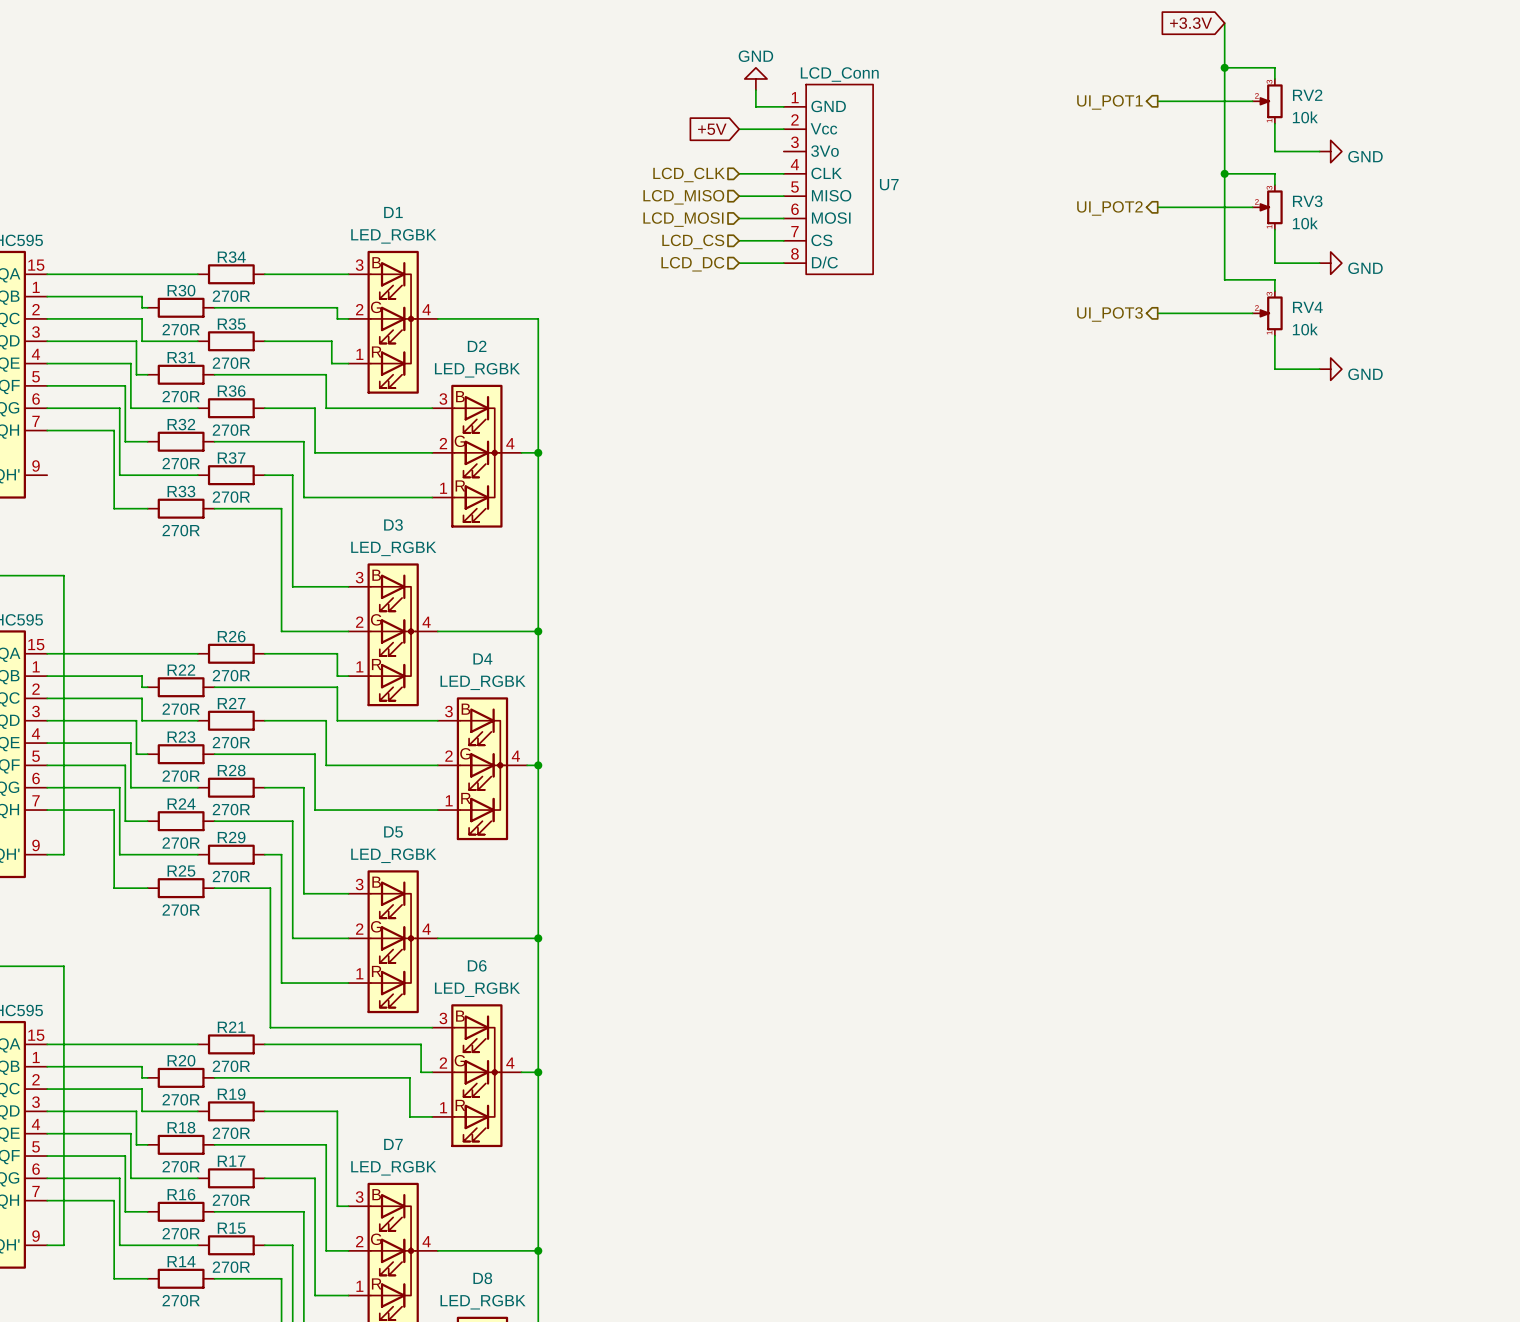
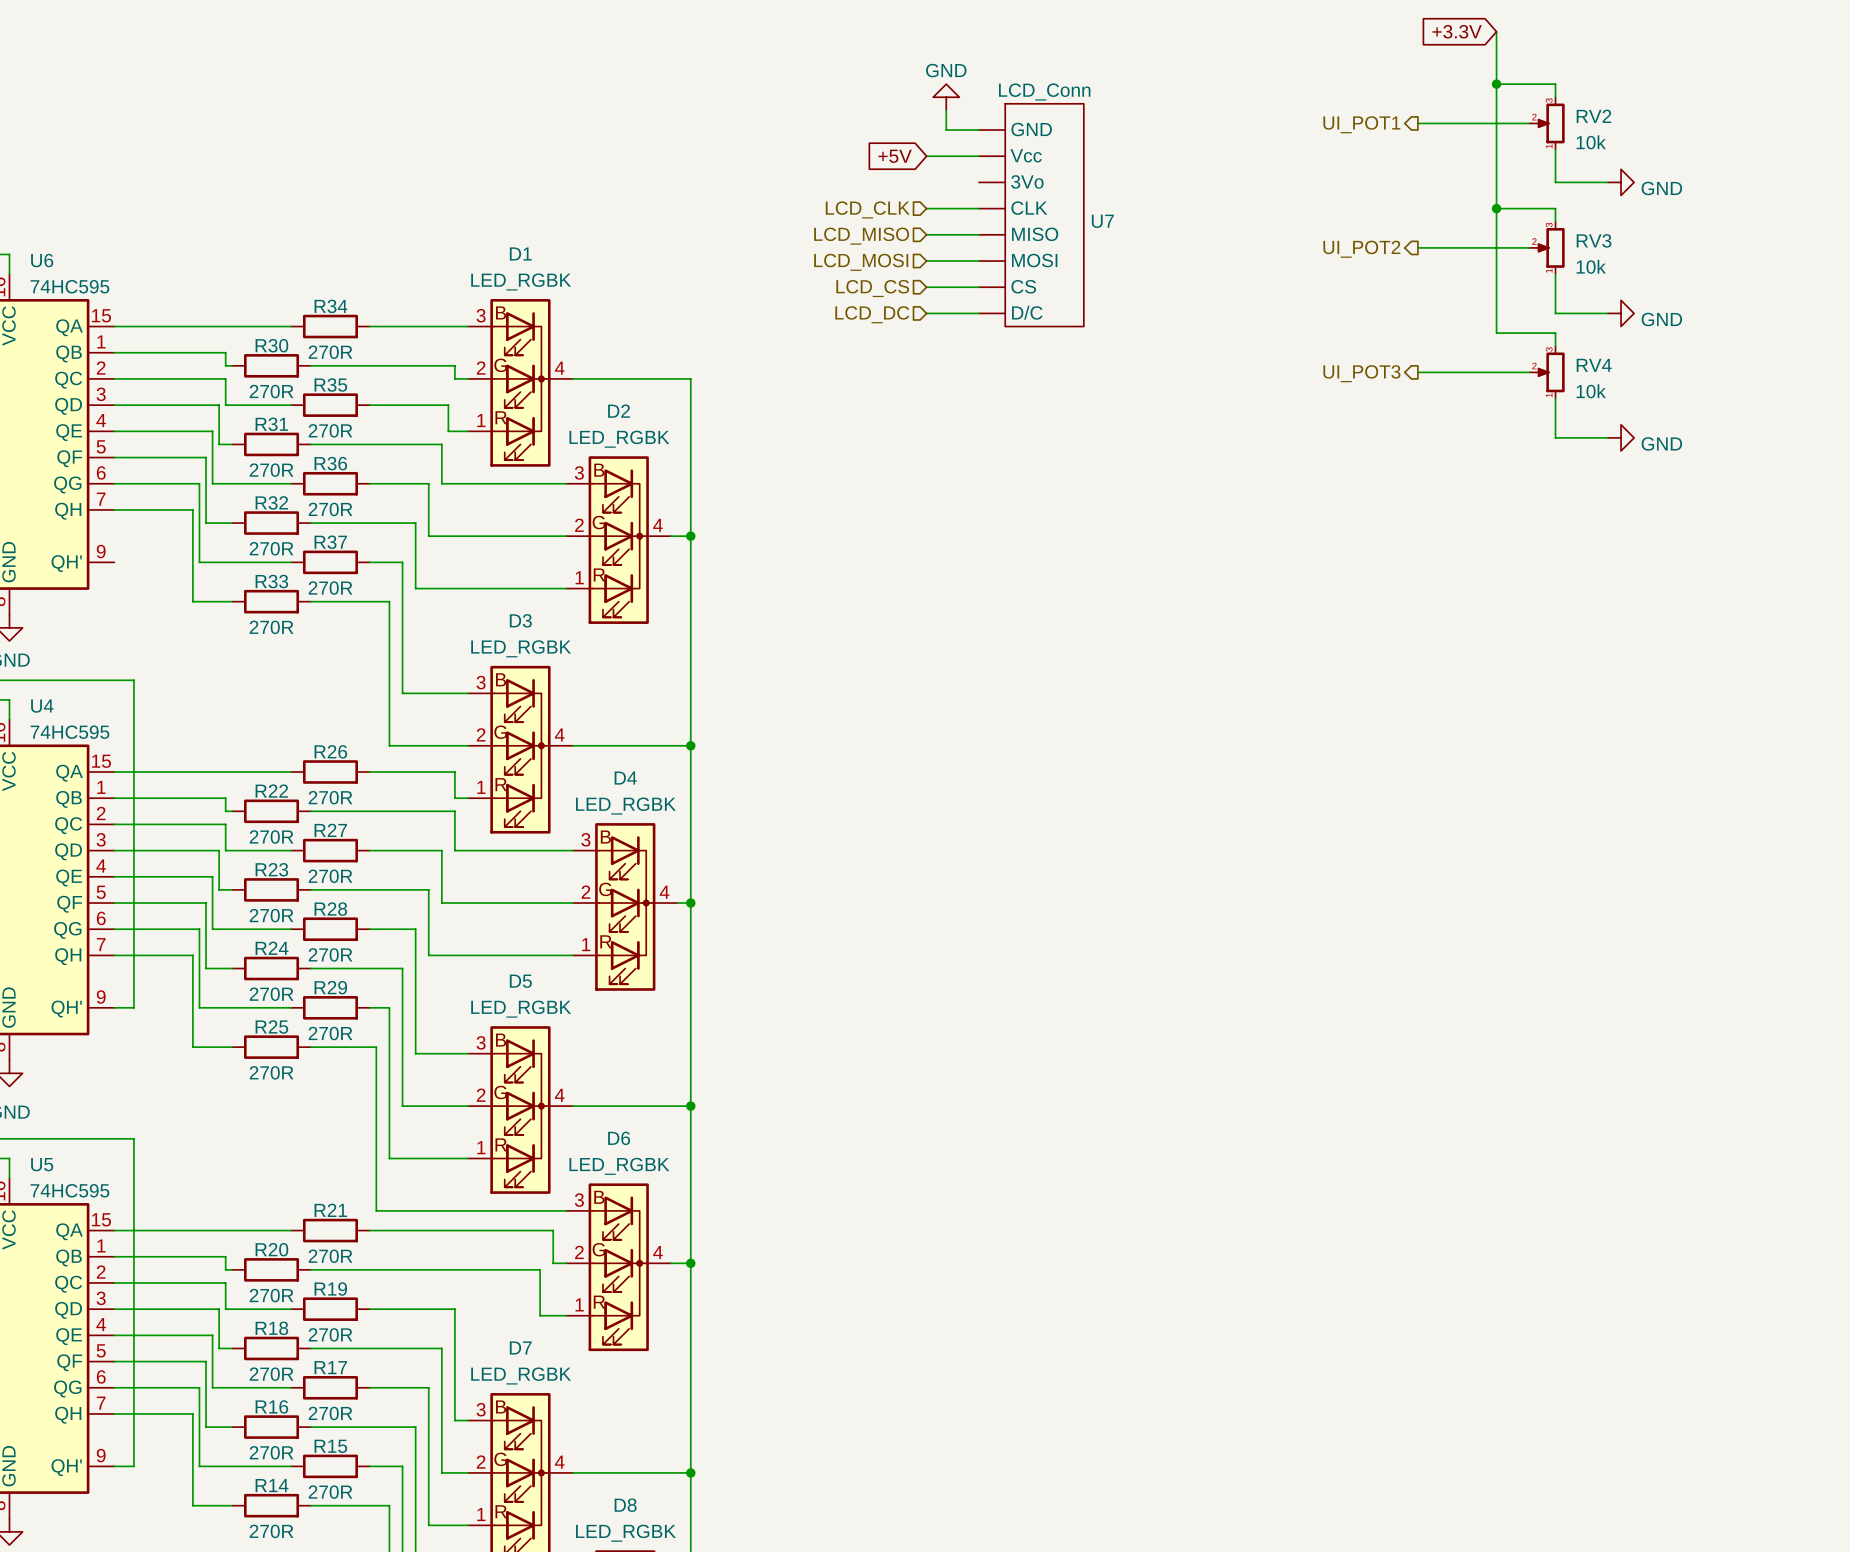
U7 pin number: 1 (795, 97) -> none
U7 pin number: 2 (794, 119) -> none
U7 pin number: 3 (794, 142) -> none
U7 pin number: 4 (794, 164) -> none
U7 pin number: 5 (794, 187) -> none
U7 pin number: 6 (795, 209) -> none
U7 pin number: 7 (794, 231) -> none
U7 pin number: 8 (794, 253) -> none

